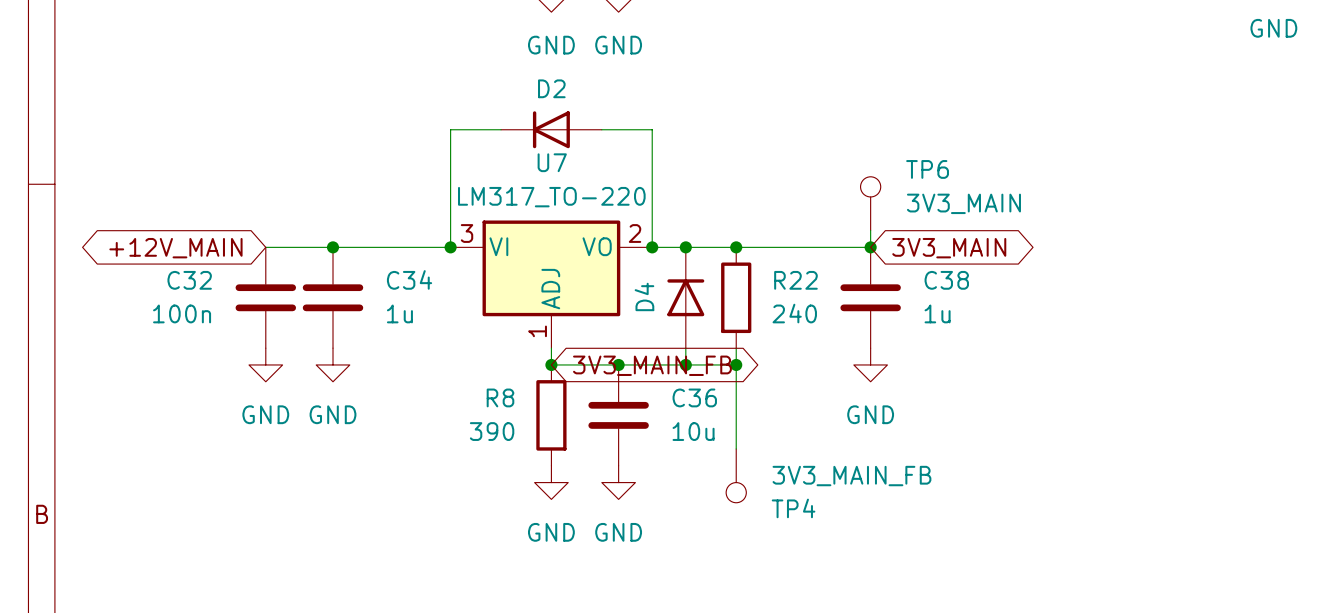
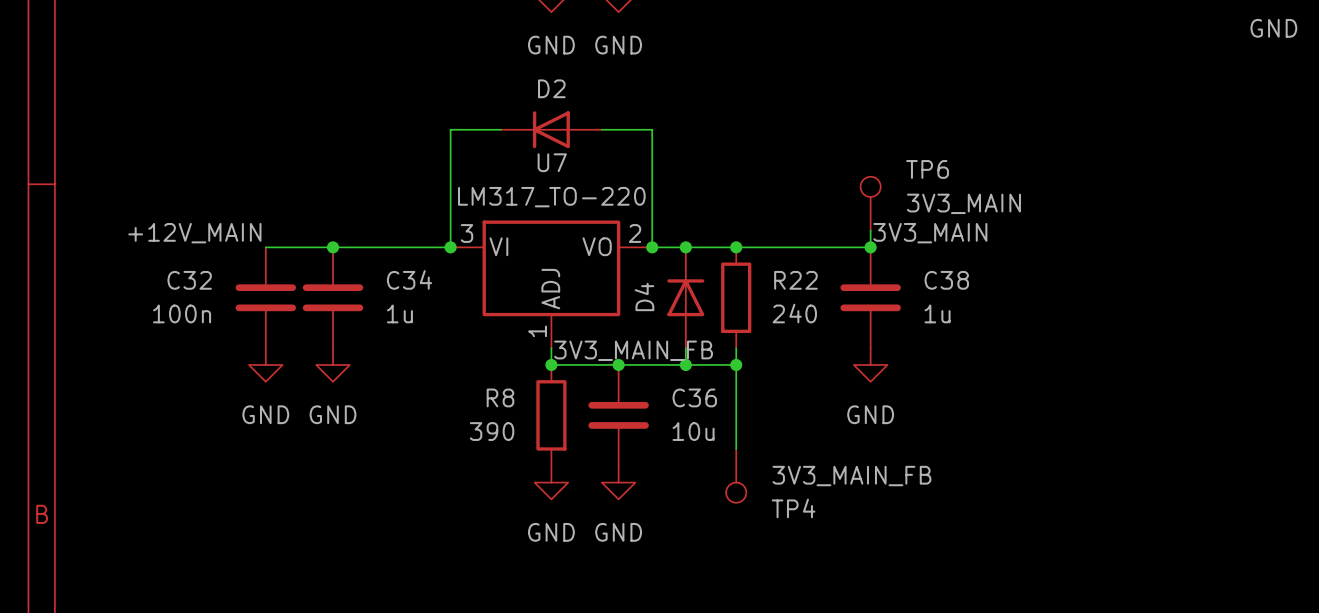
label: none -> +12V_MAIN (194, 233)
label: none -> 3V3_MAIN (930, 233)
global label: +12V_MAIN (175, 248) -> none
global label: 3V3_MAIN (949, 248) -> none
label: none -> 3V3_MAIN_FB (633, 350)
global label: 3V3_MAIN_FB (652, 365) -> none

